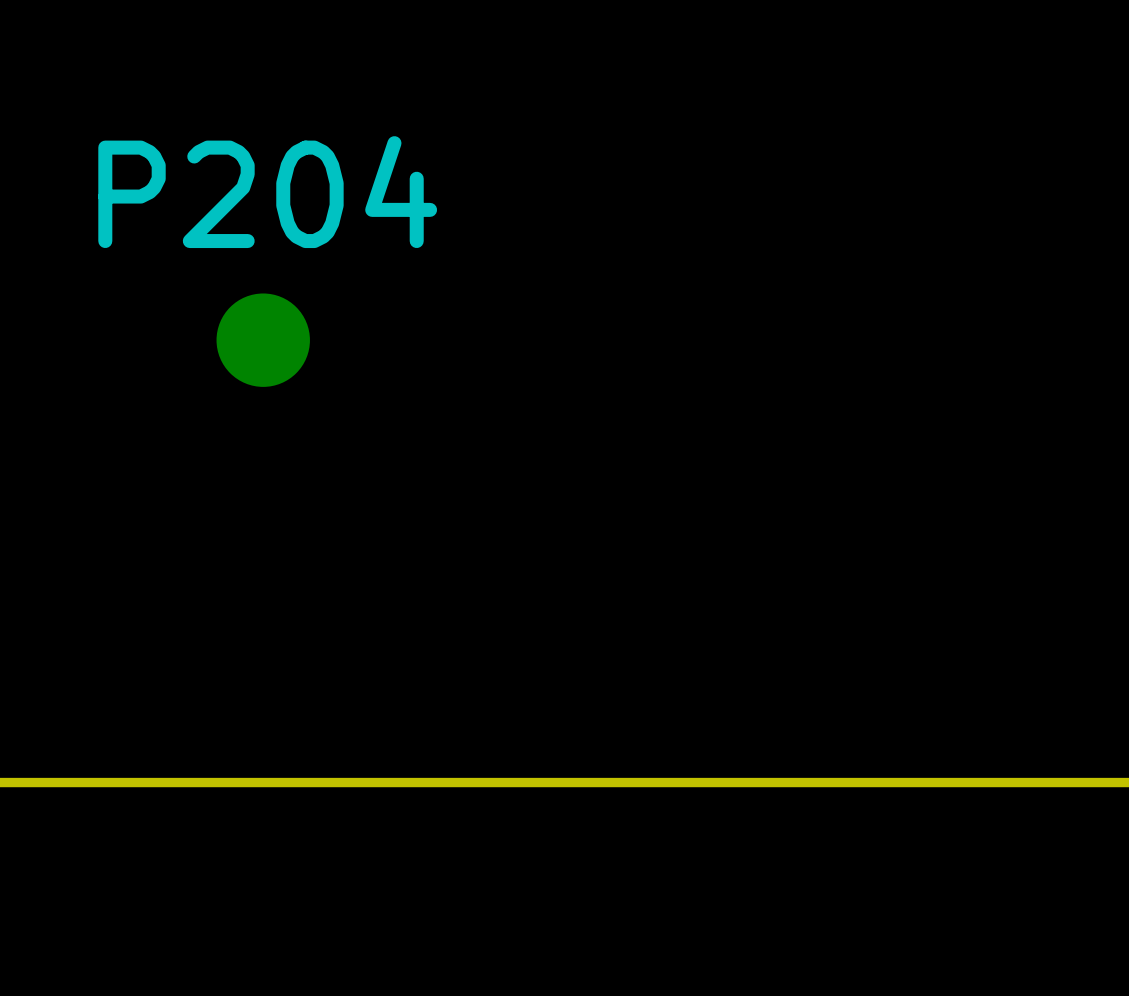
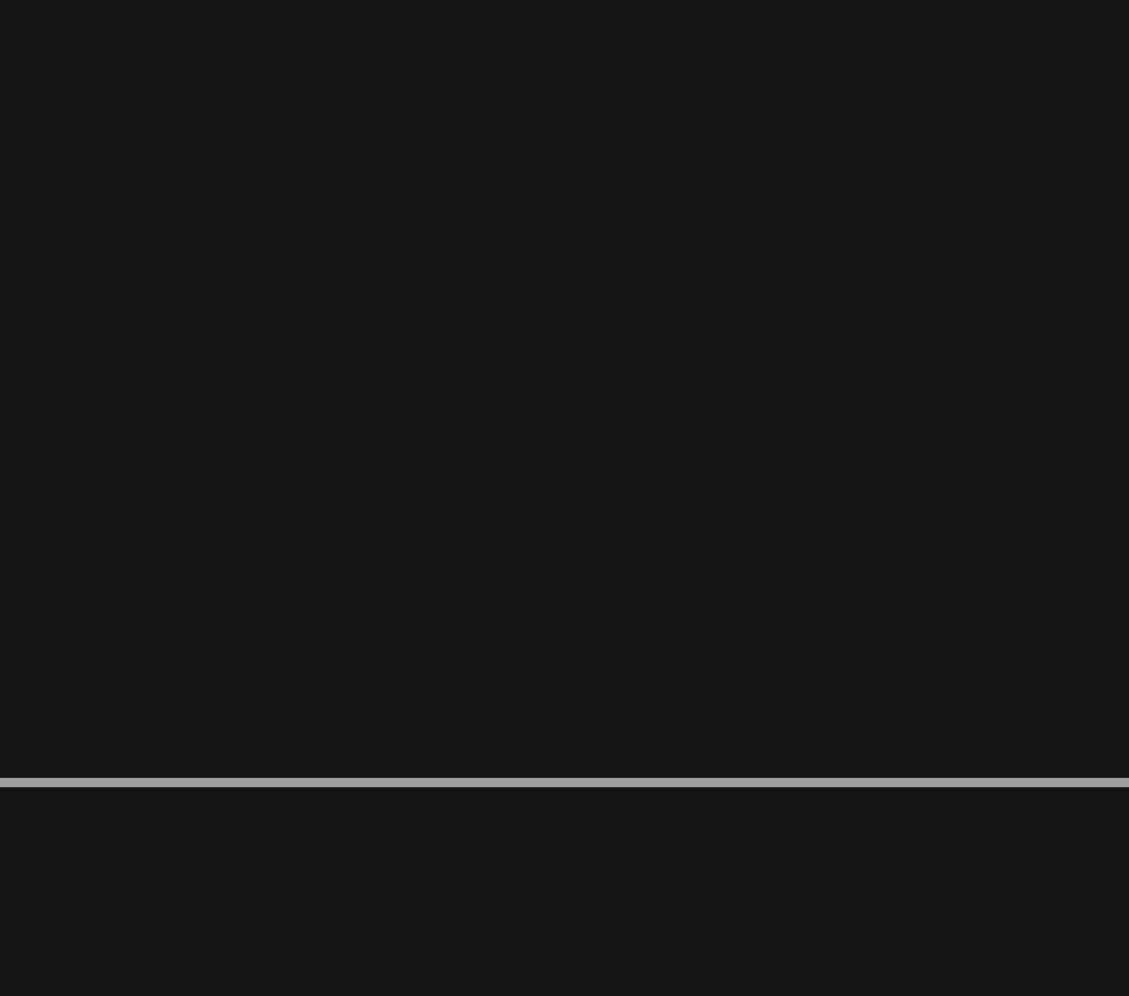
P204: (263, 340) -> none

